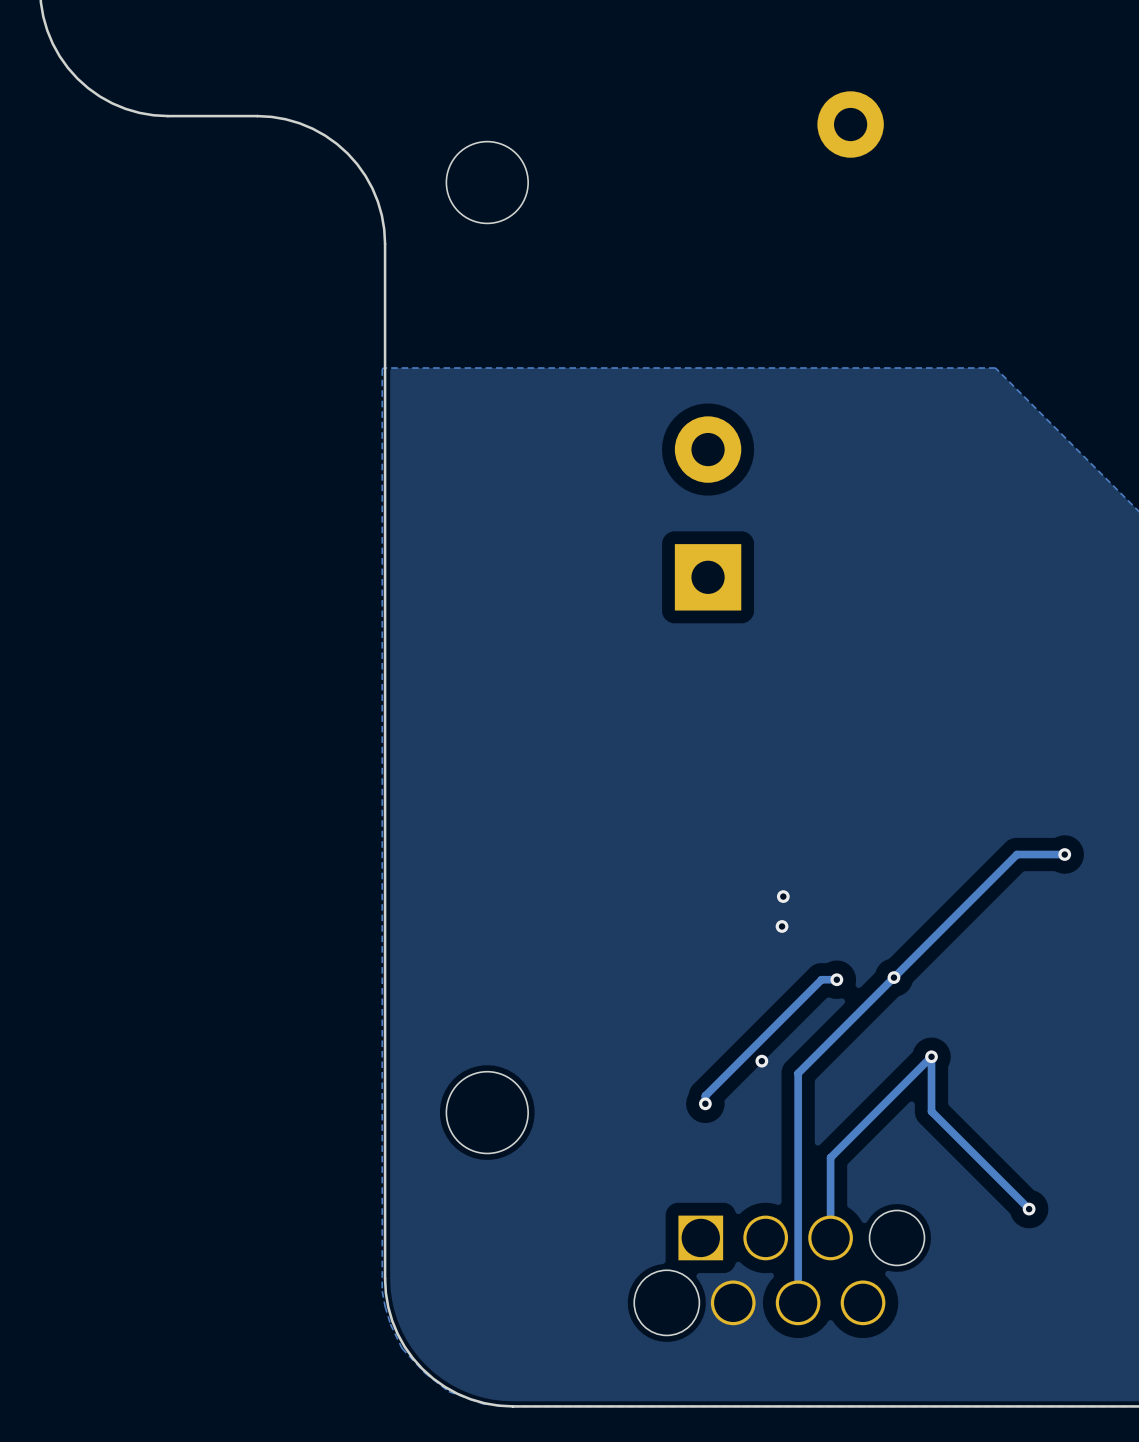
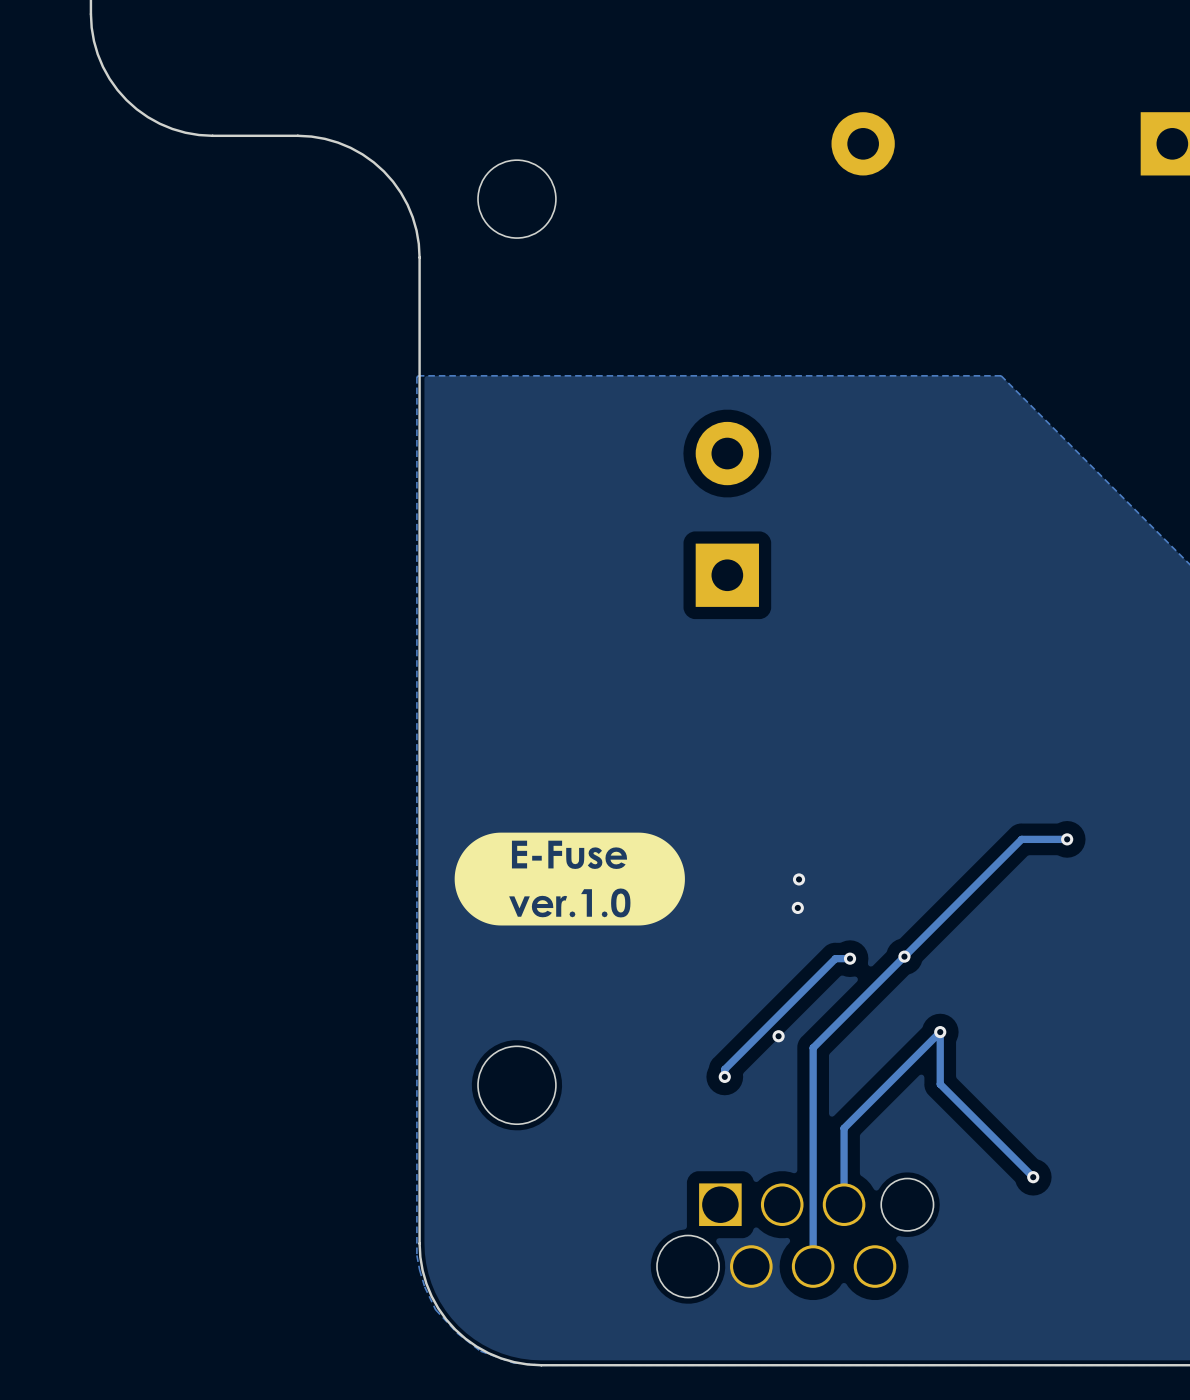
drawing: none -> [454, 832, 685, 926]

